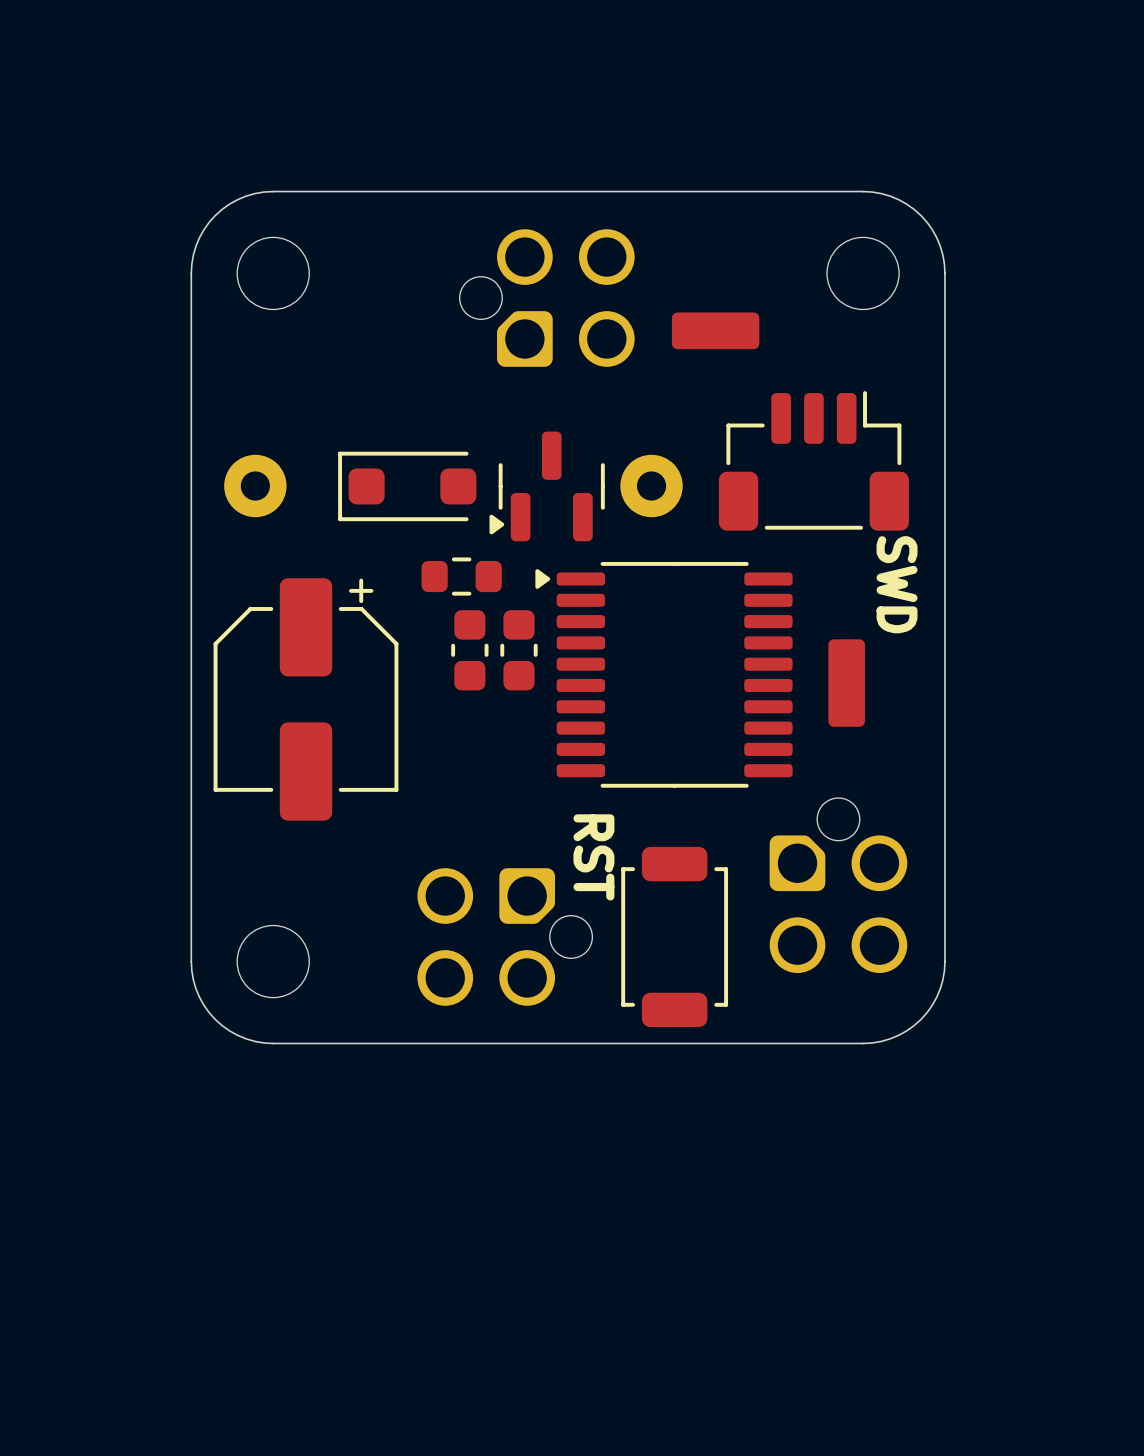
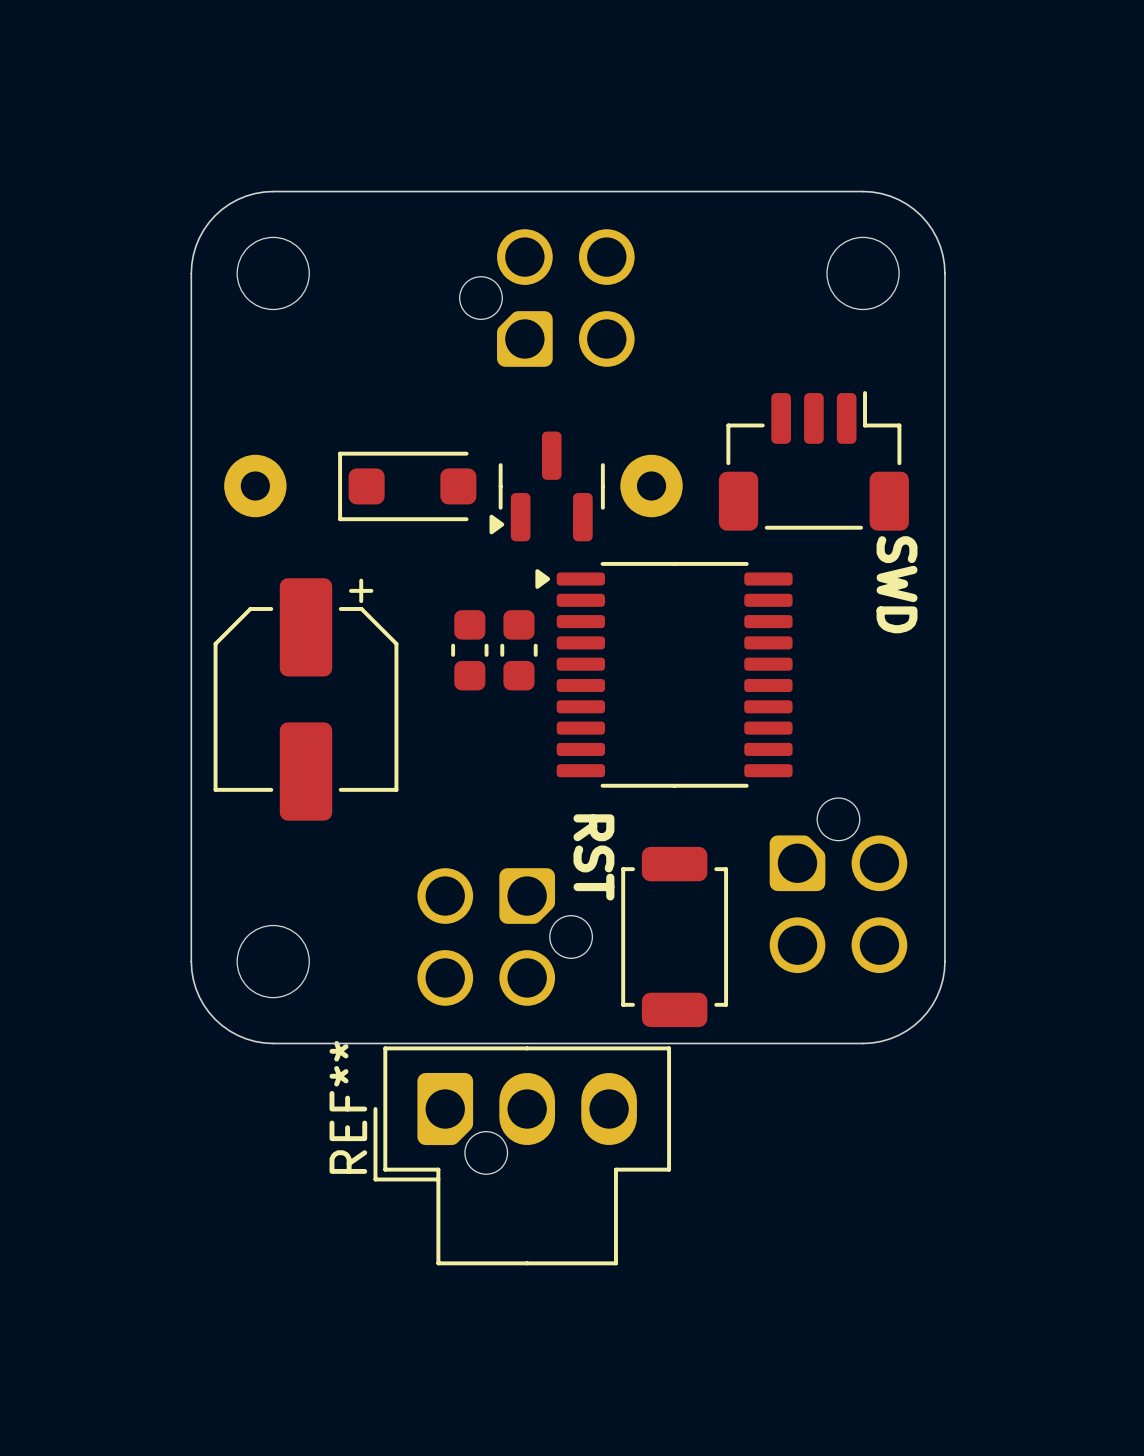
part: (715, 330) -> none
part: (461, 576) -> none
part: (846, 683) -> none
REF**: none -> (522, 1155)

